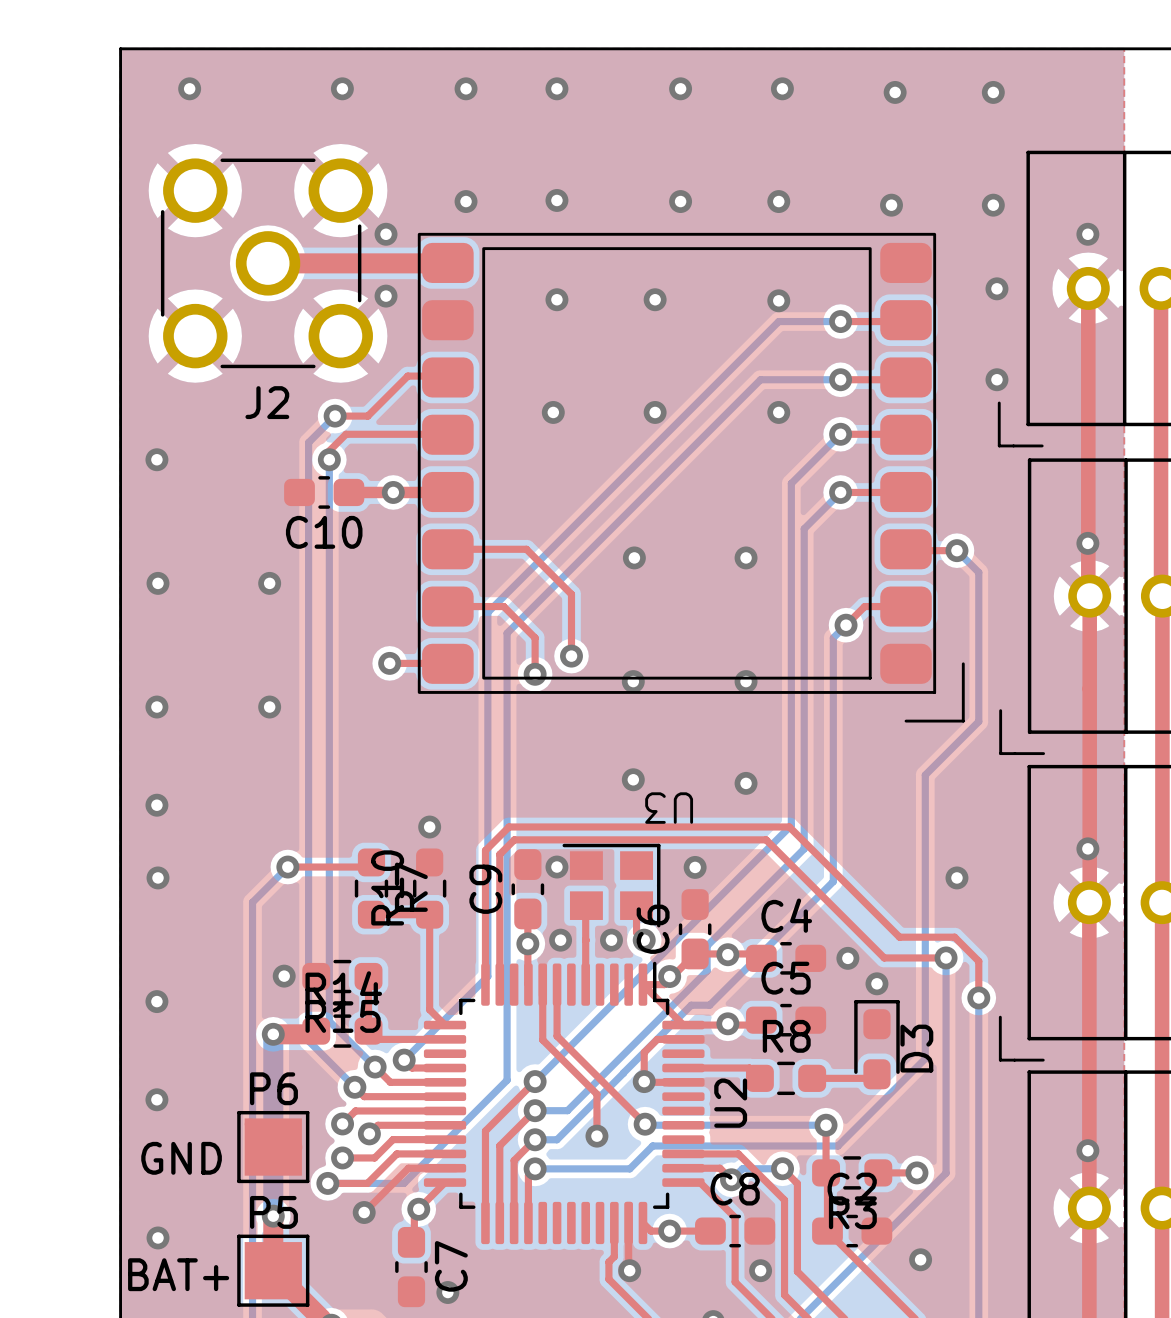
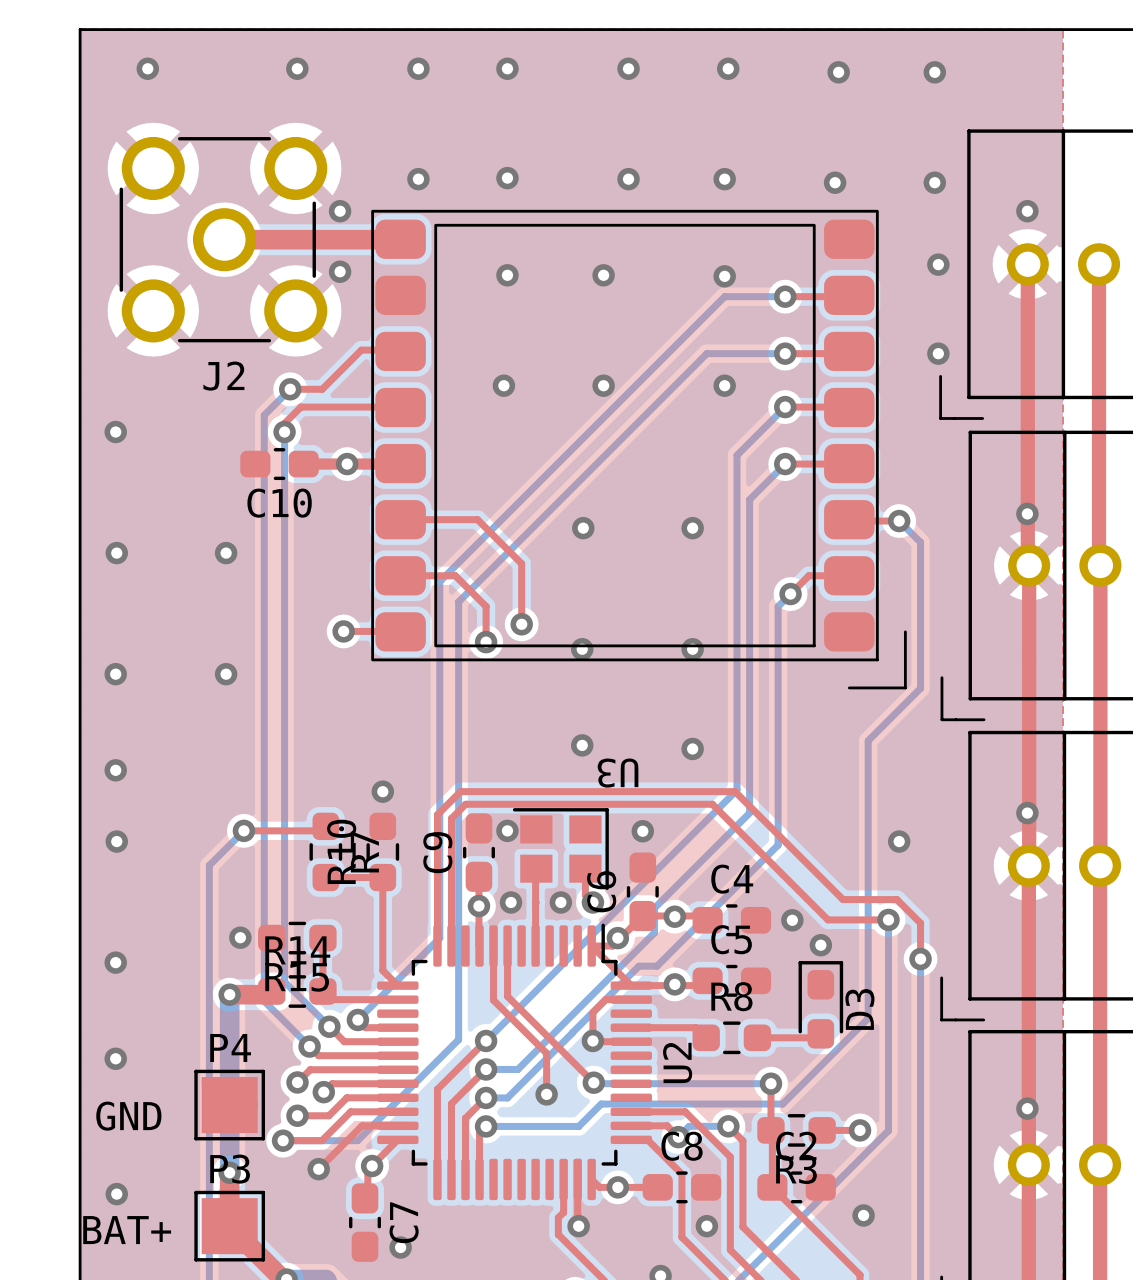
P6 name: P6 (273, 1088) -> P4 (230, 1048)
P5 name: P5 (273, 1212) -> P3 (230, 1169)

